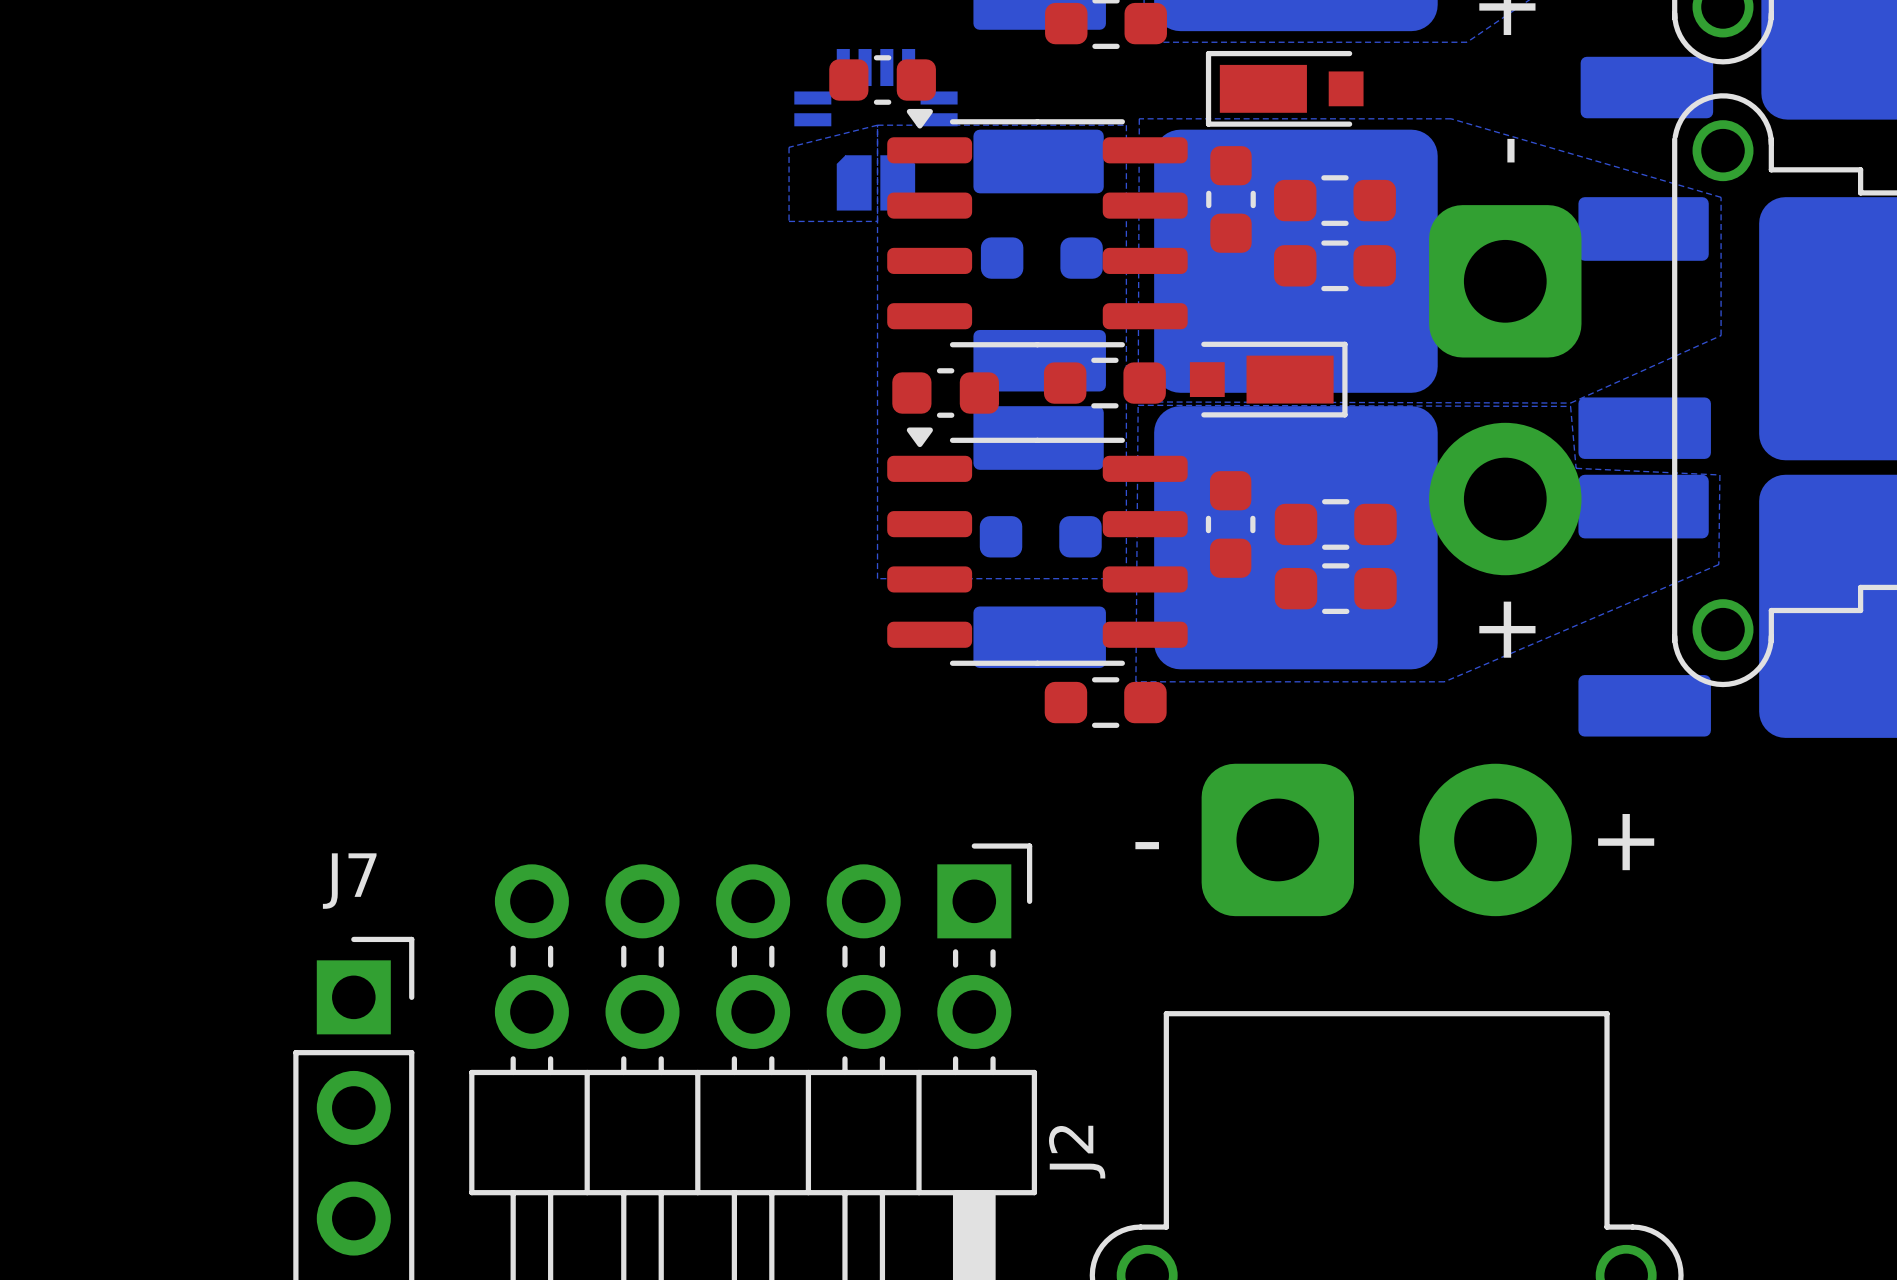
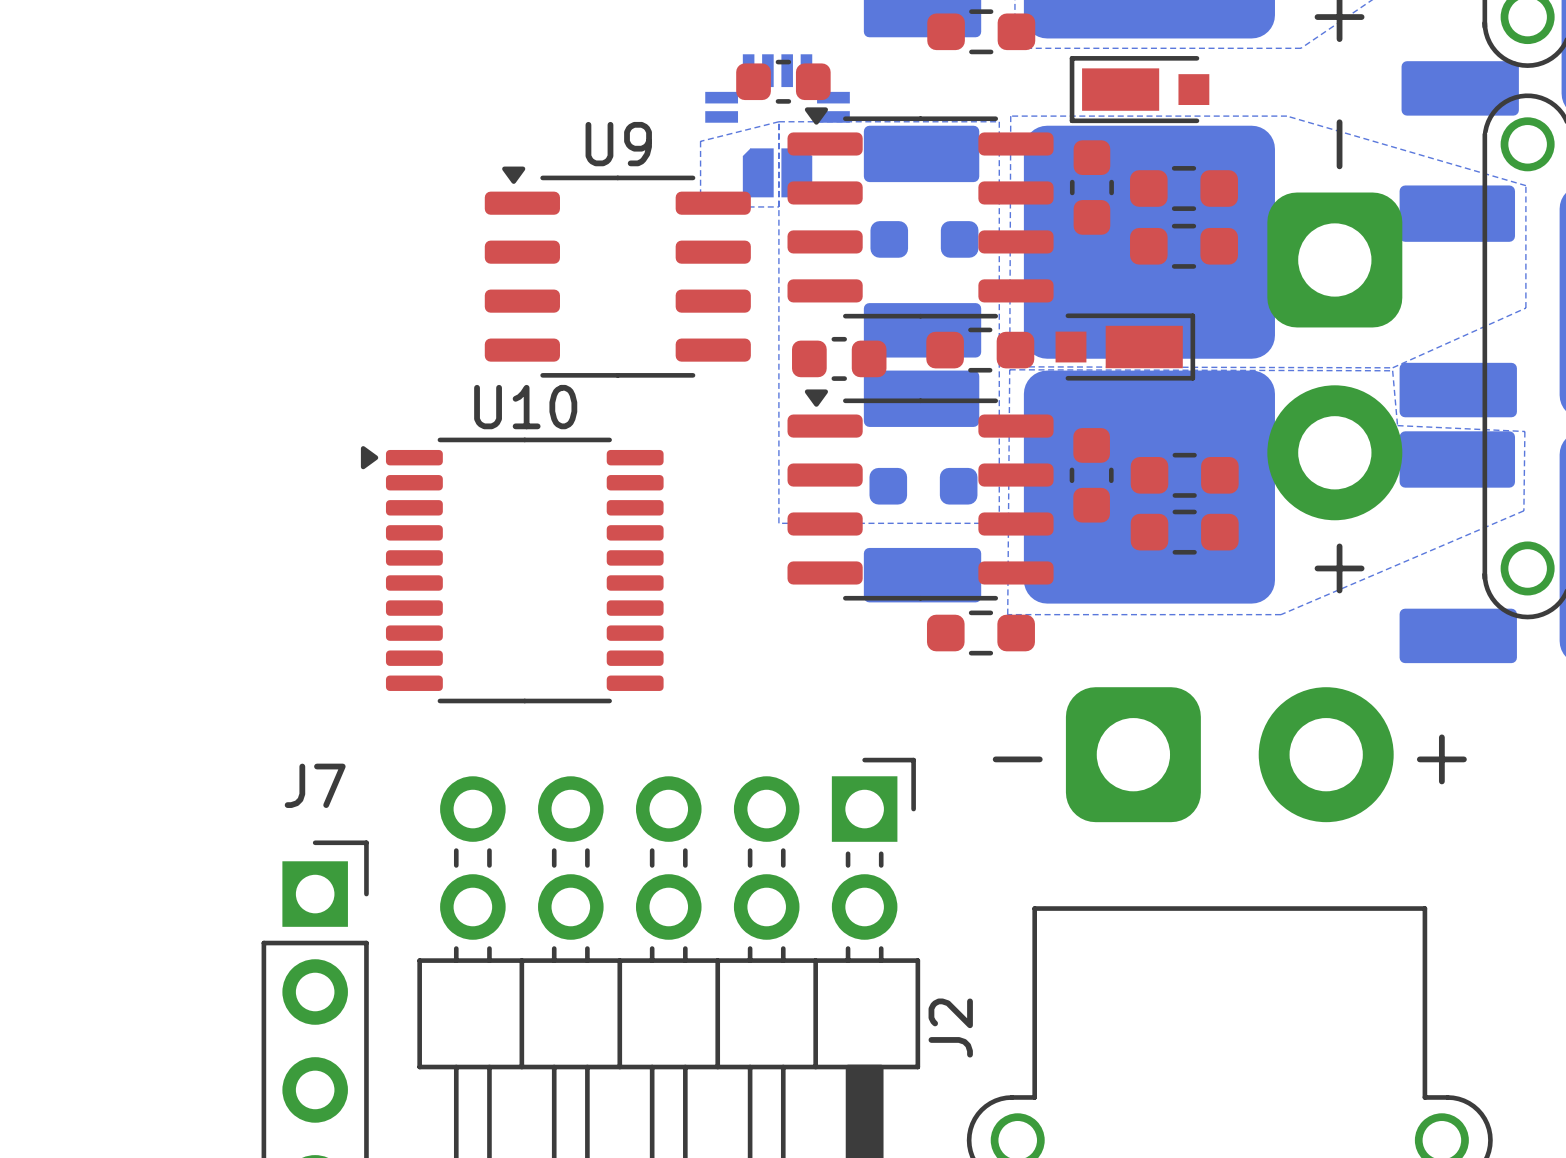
U9: none -> (617, 272)
U10: none -> (512, 570)

